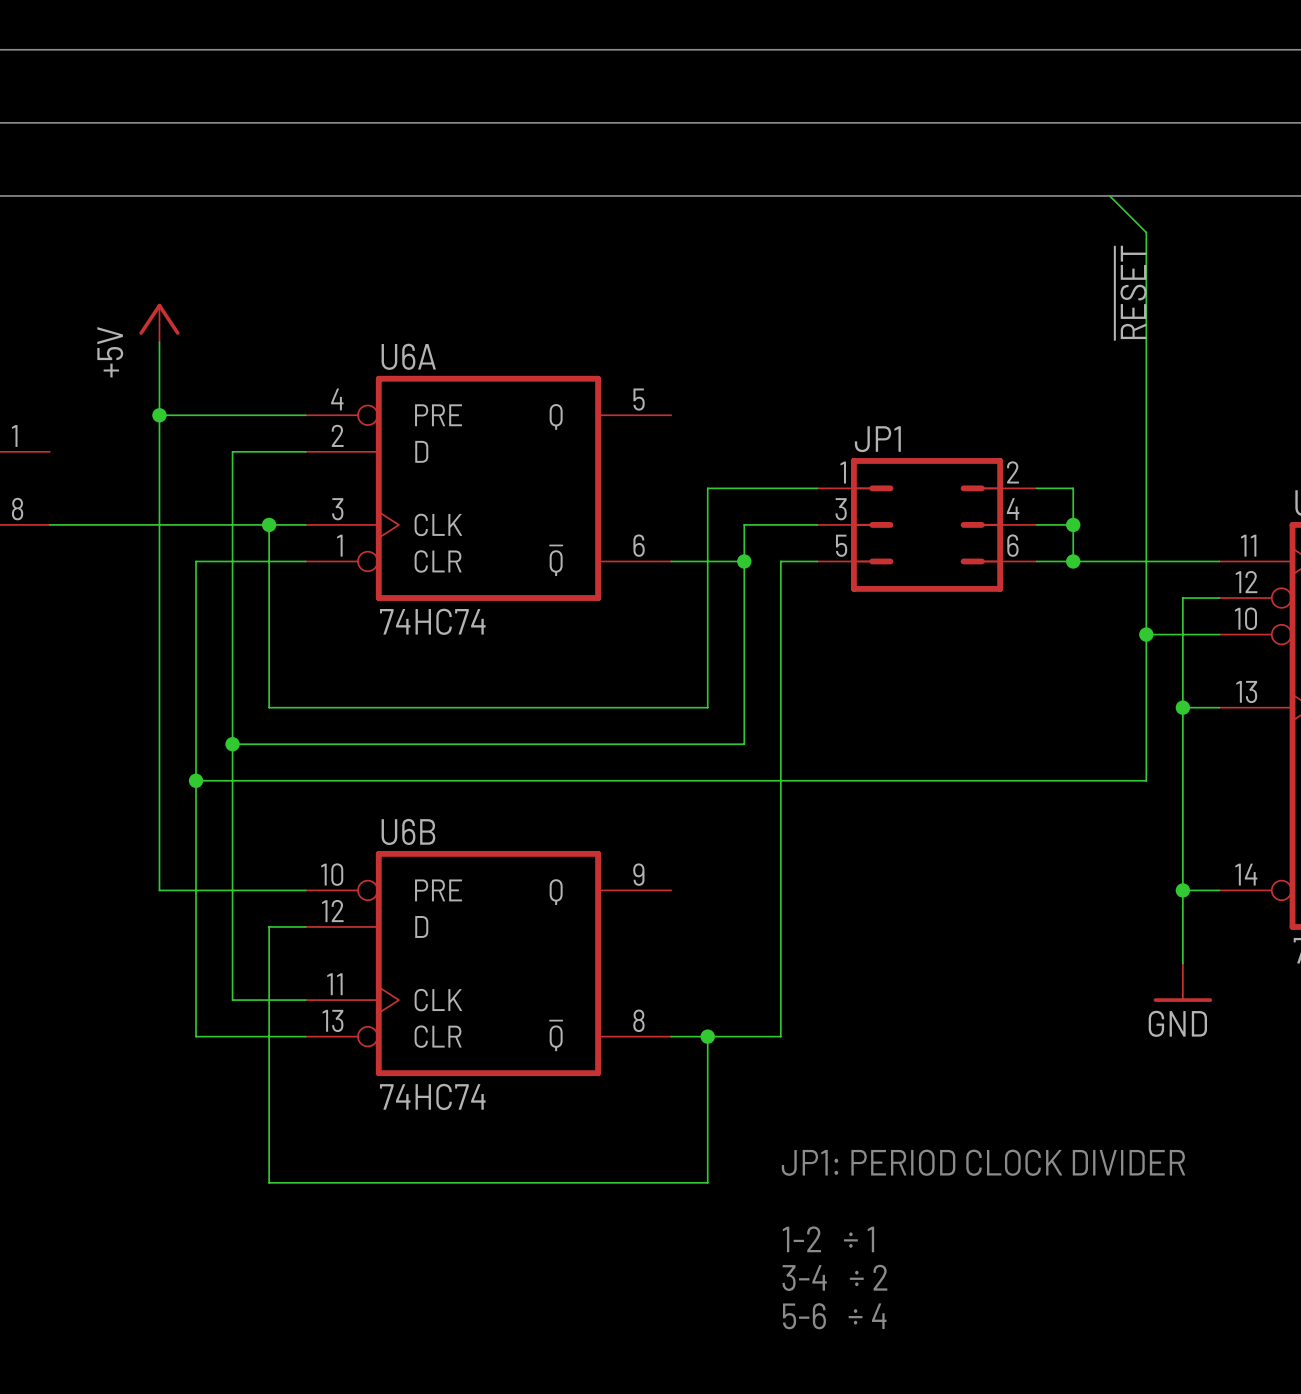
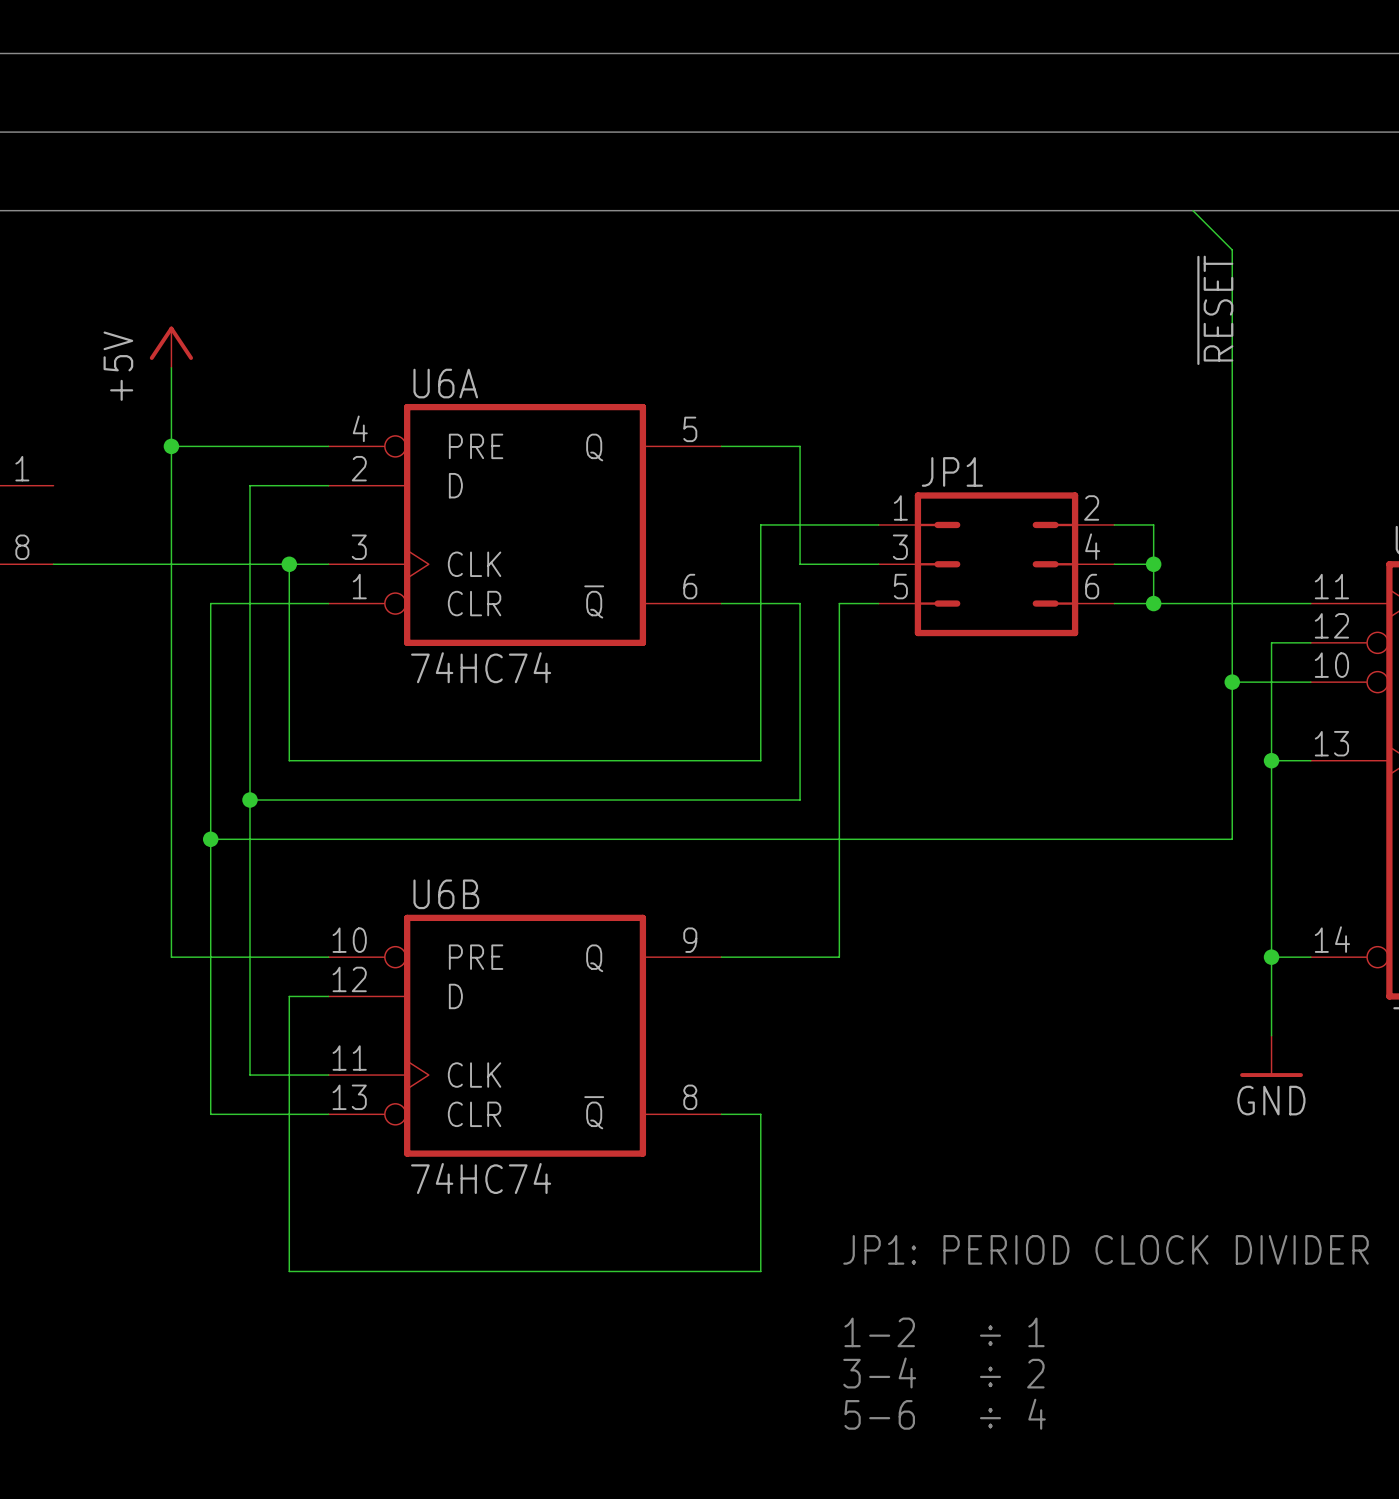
wire: (744, 524) (744, 561) -> (800, 564) (800, 446) (721, 446)
junction: (744, 561) -> none
wire: (780, 890) (780, 1036) (707, 1036) -> (839, 957) (721, 957)
junction: (707, 1036) -> none

